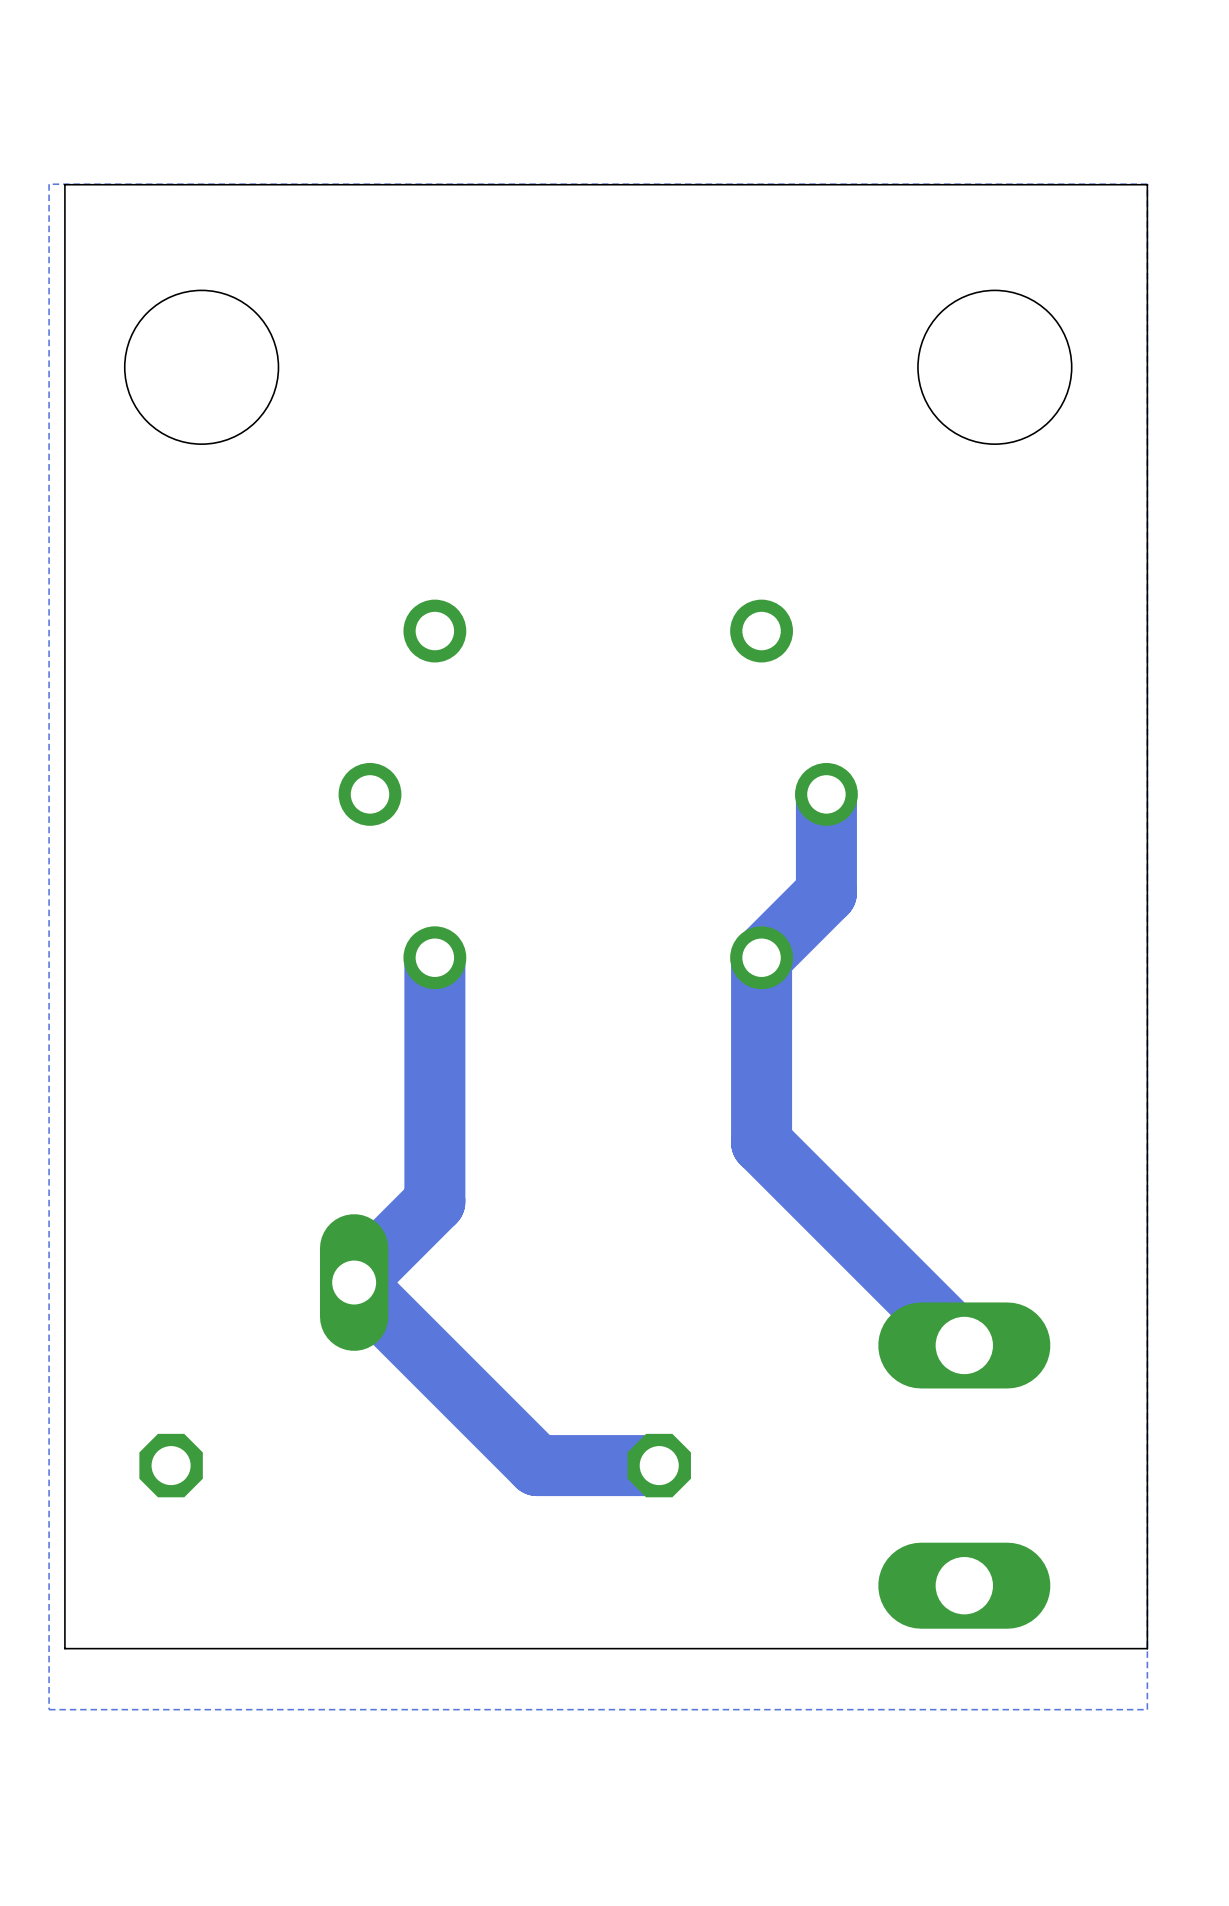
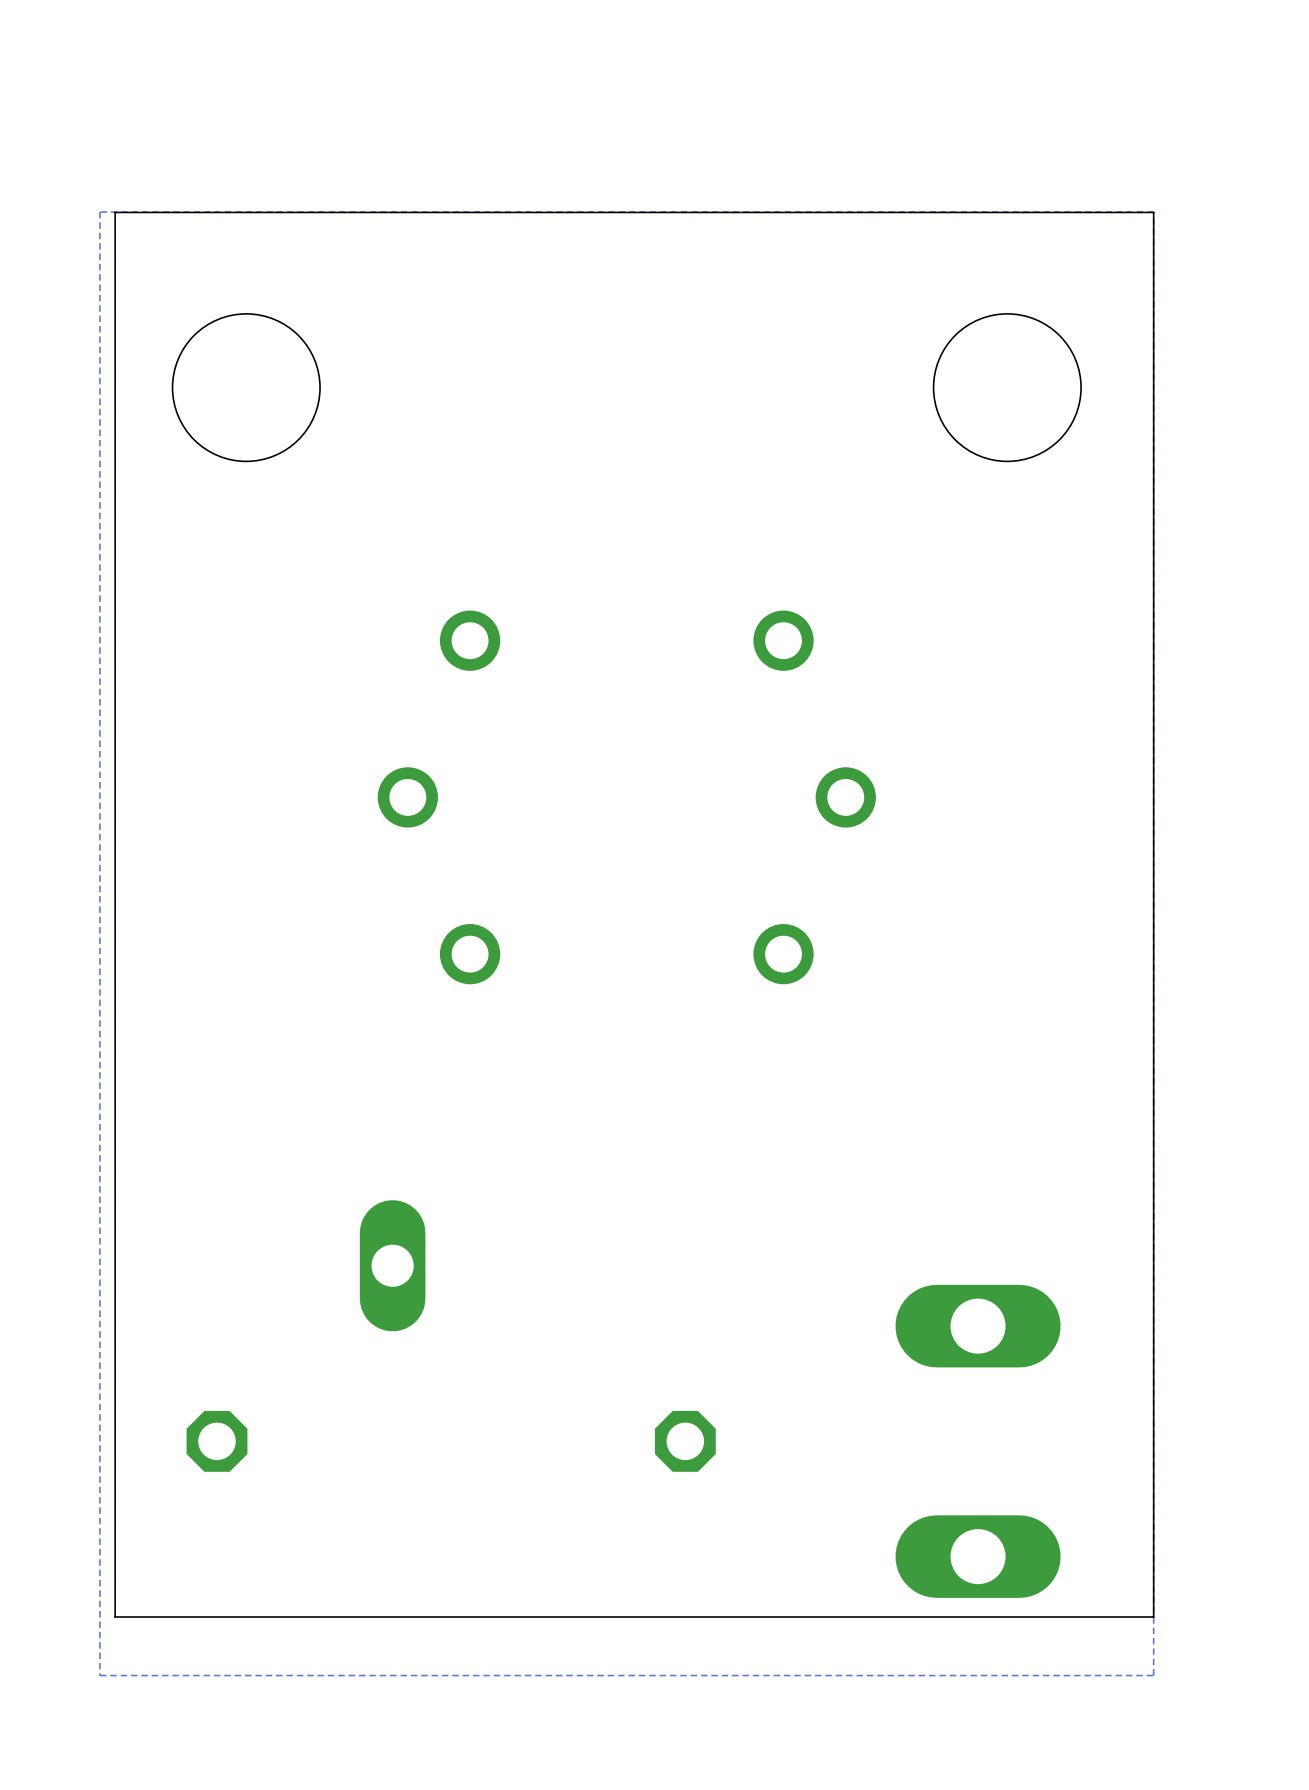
track: (826, 794) (826, 892) (761, 957) (761, 1142) (964, 1345) -> none
track: (434, 957) (434, 1201) (354, 1282) (537, 1465) (659, 1465) -> none

